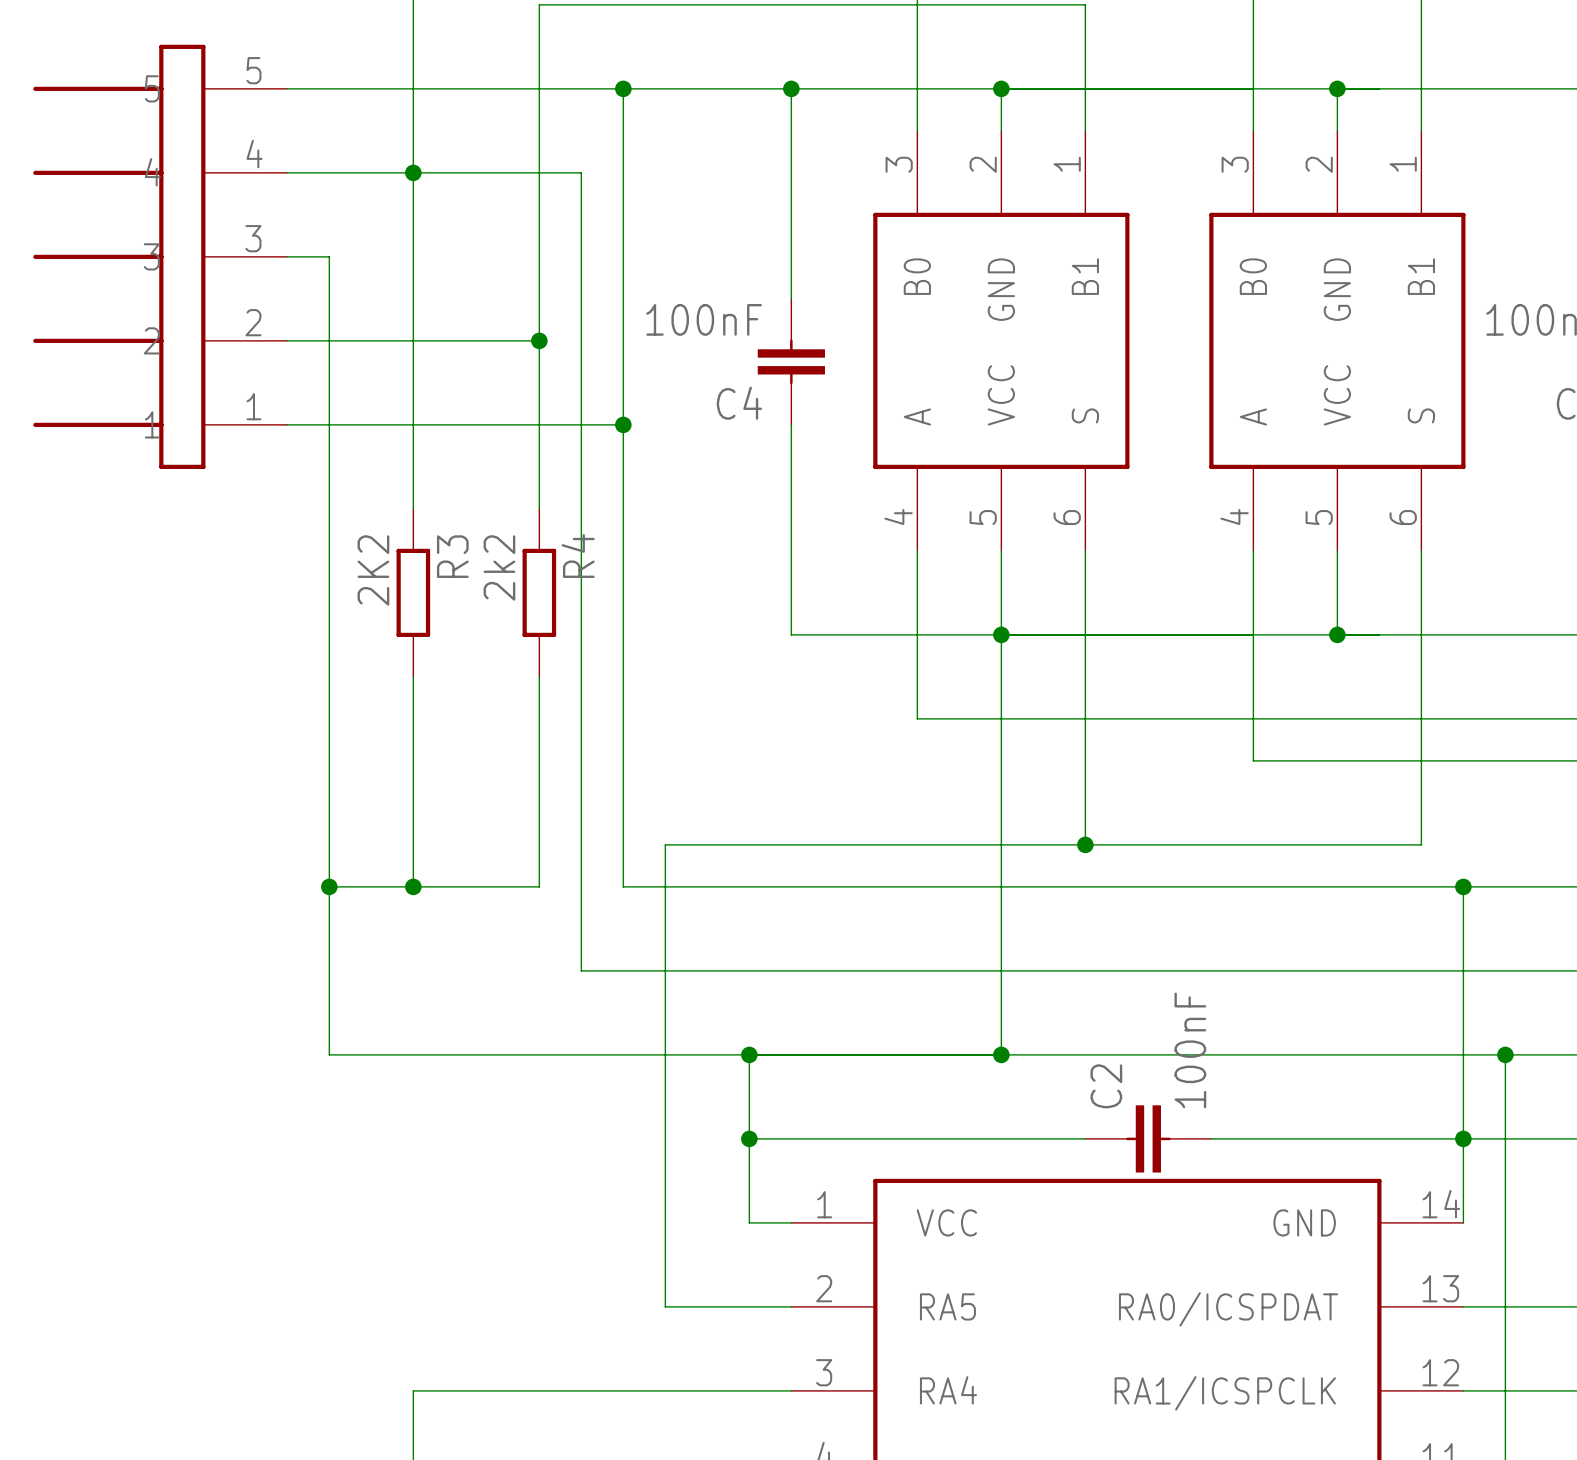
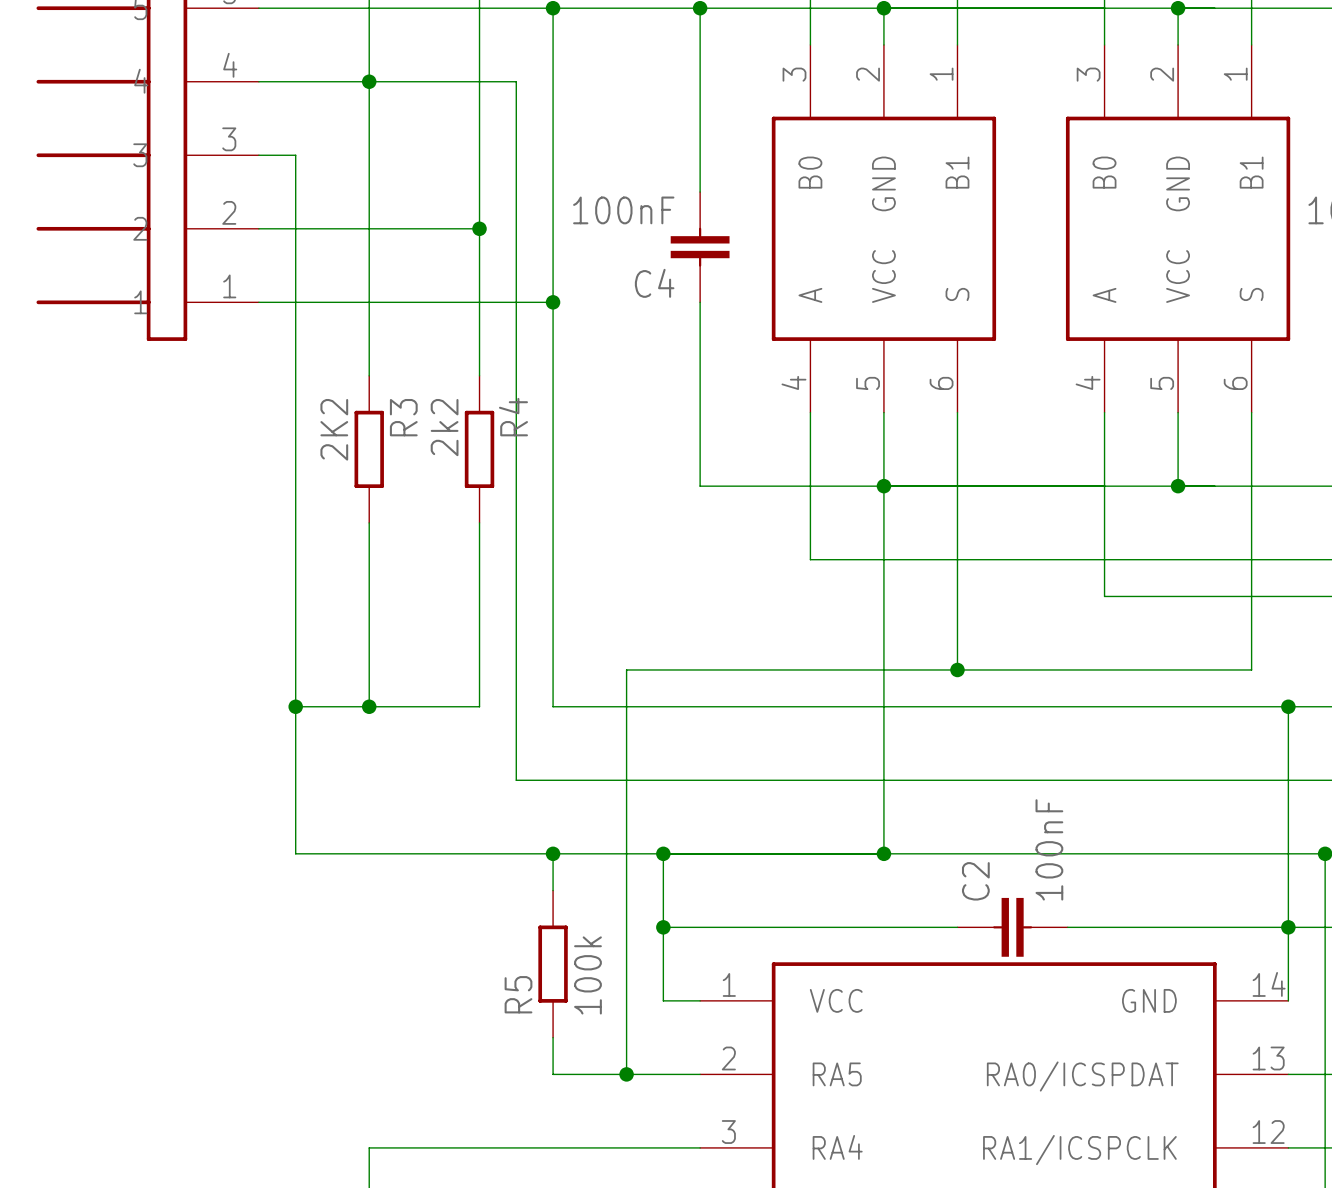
wire: (707, 844) (665, 844) (665, 1306) -> (626, 669) (626, 1074)
wire: none -> (553, 853) (553, 890)
junction: none -> (553, 853)
R5: none -> 100k (553, 964)
wire: none -> (553, 1037) (553, 1074) (589, 1074)
junction: none -> (626, 1074)

